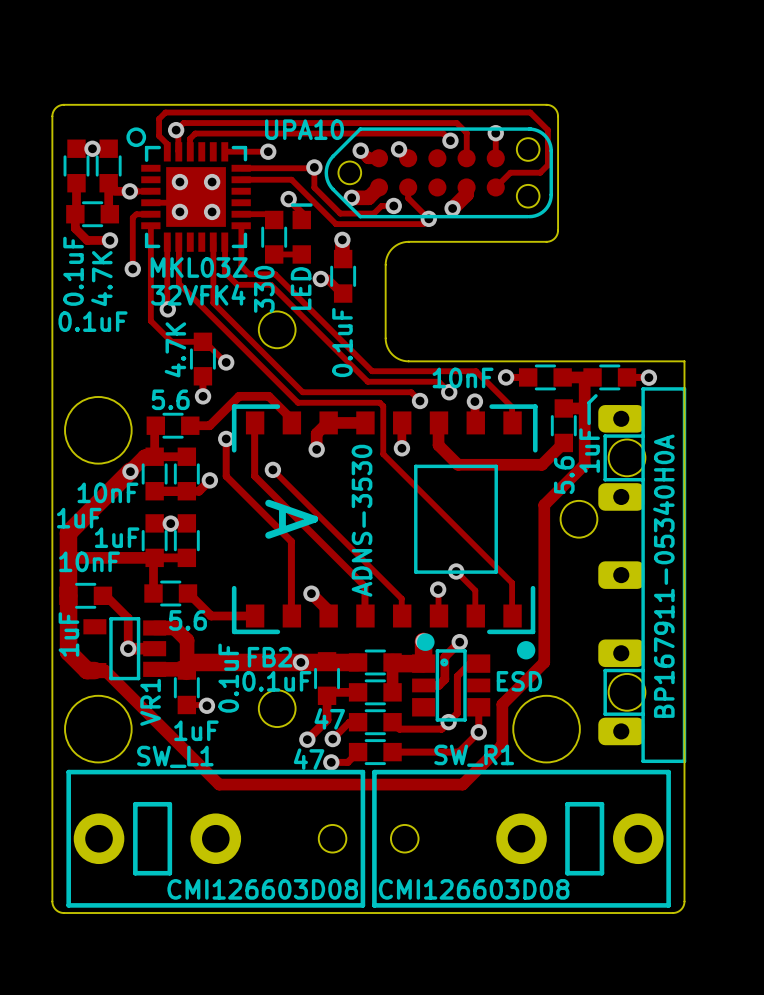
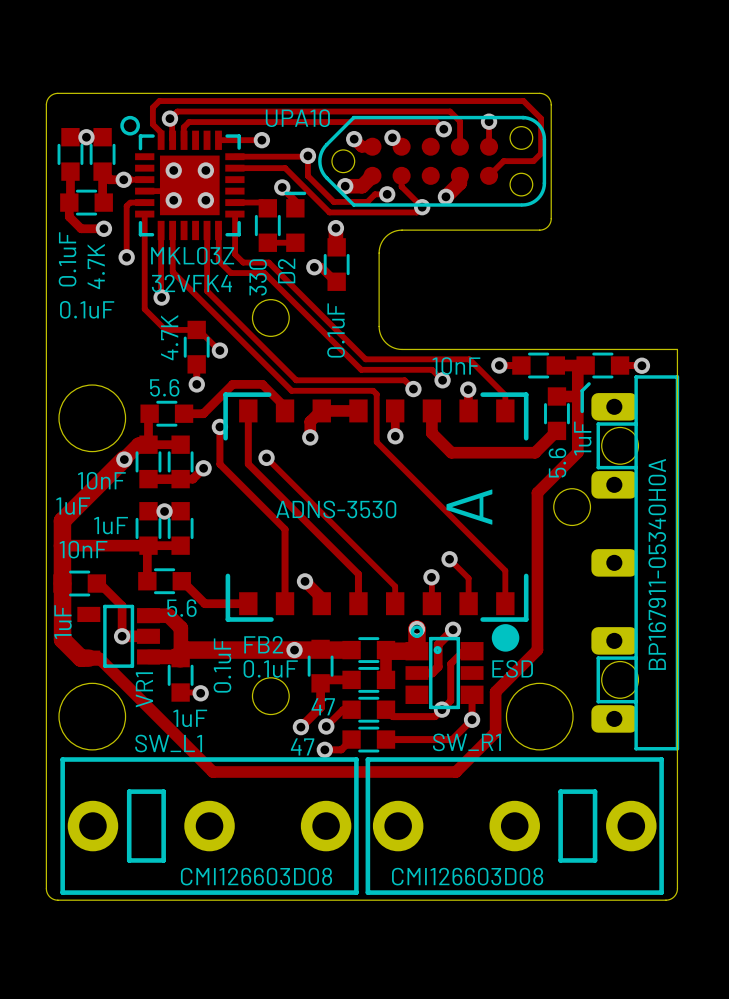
D2 name: none -> D2 (286, 270)
D2 value: LED (301, 288) -> none
part side: top (384, 531) -> bottom (375, 522)
drawing: [417, 633, 435, 651] -> none
SW_L1 footprint: [66, 769, 366, 908] -> [60, 757, 359, 895]
SW_R1 footprint: [372, 769, 671, 908] -> [365, 757, 664, 895]

